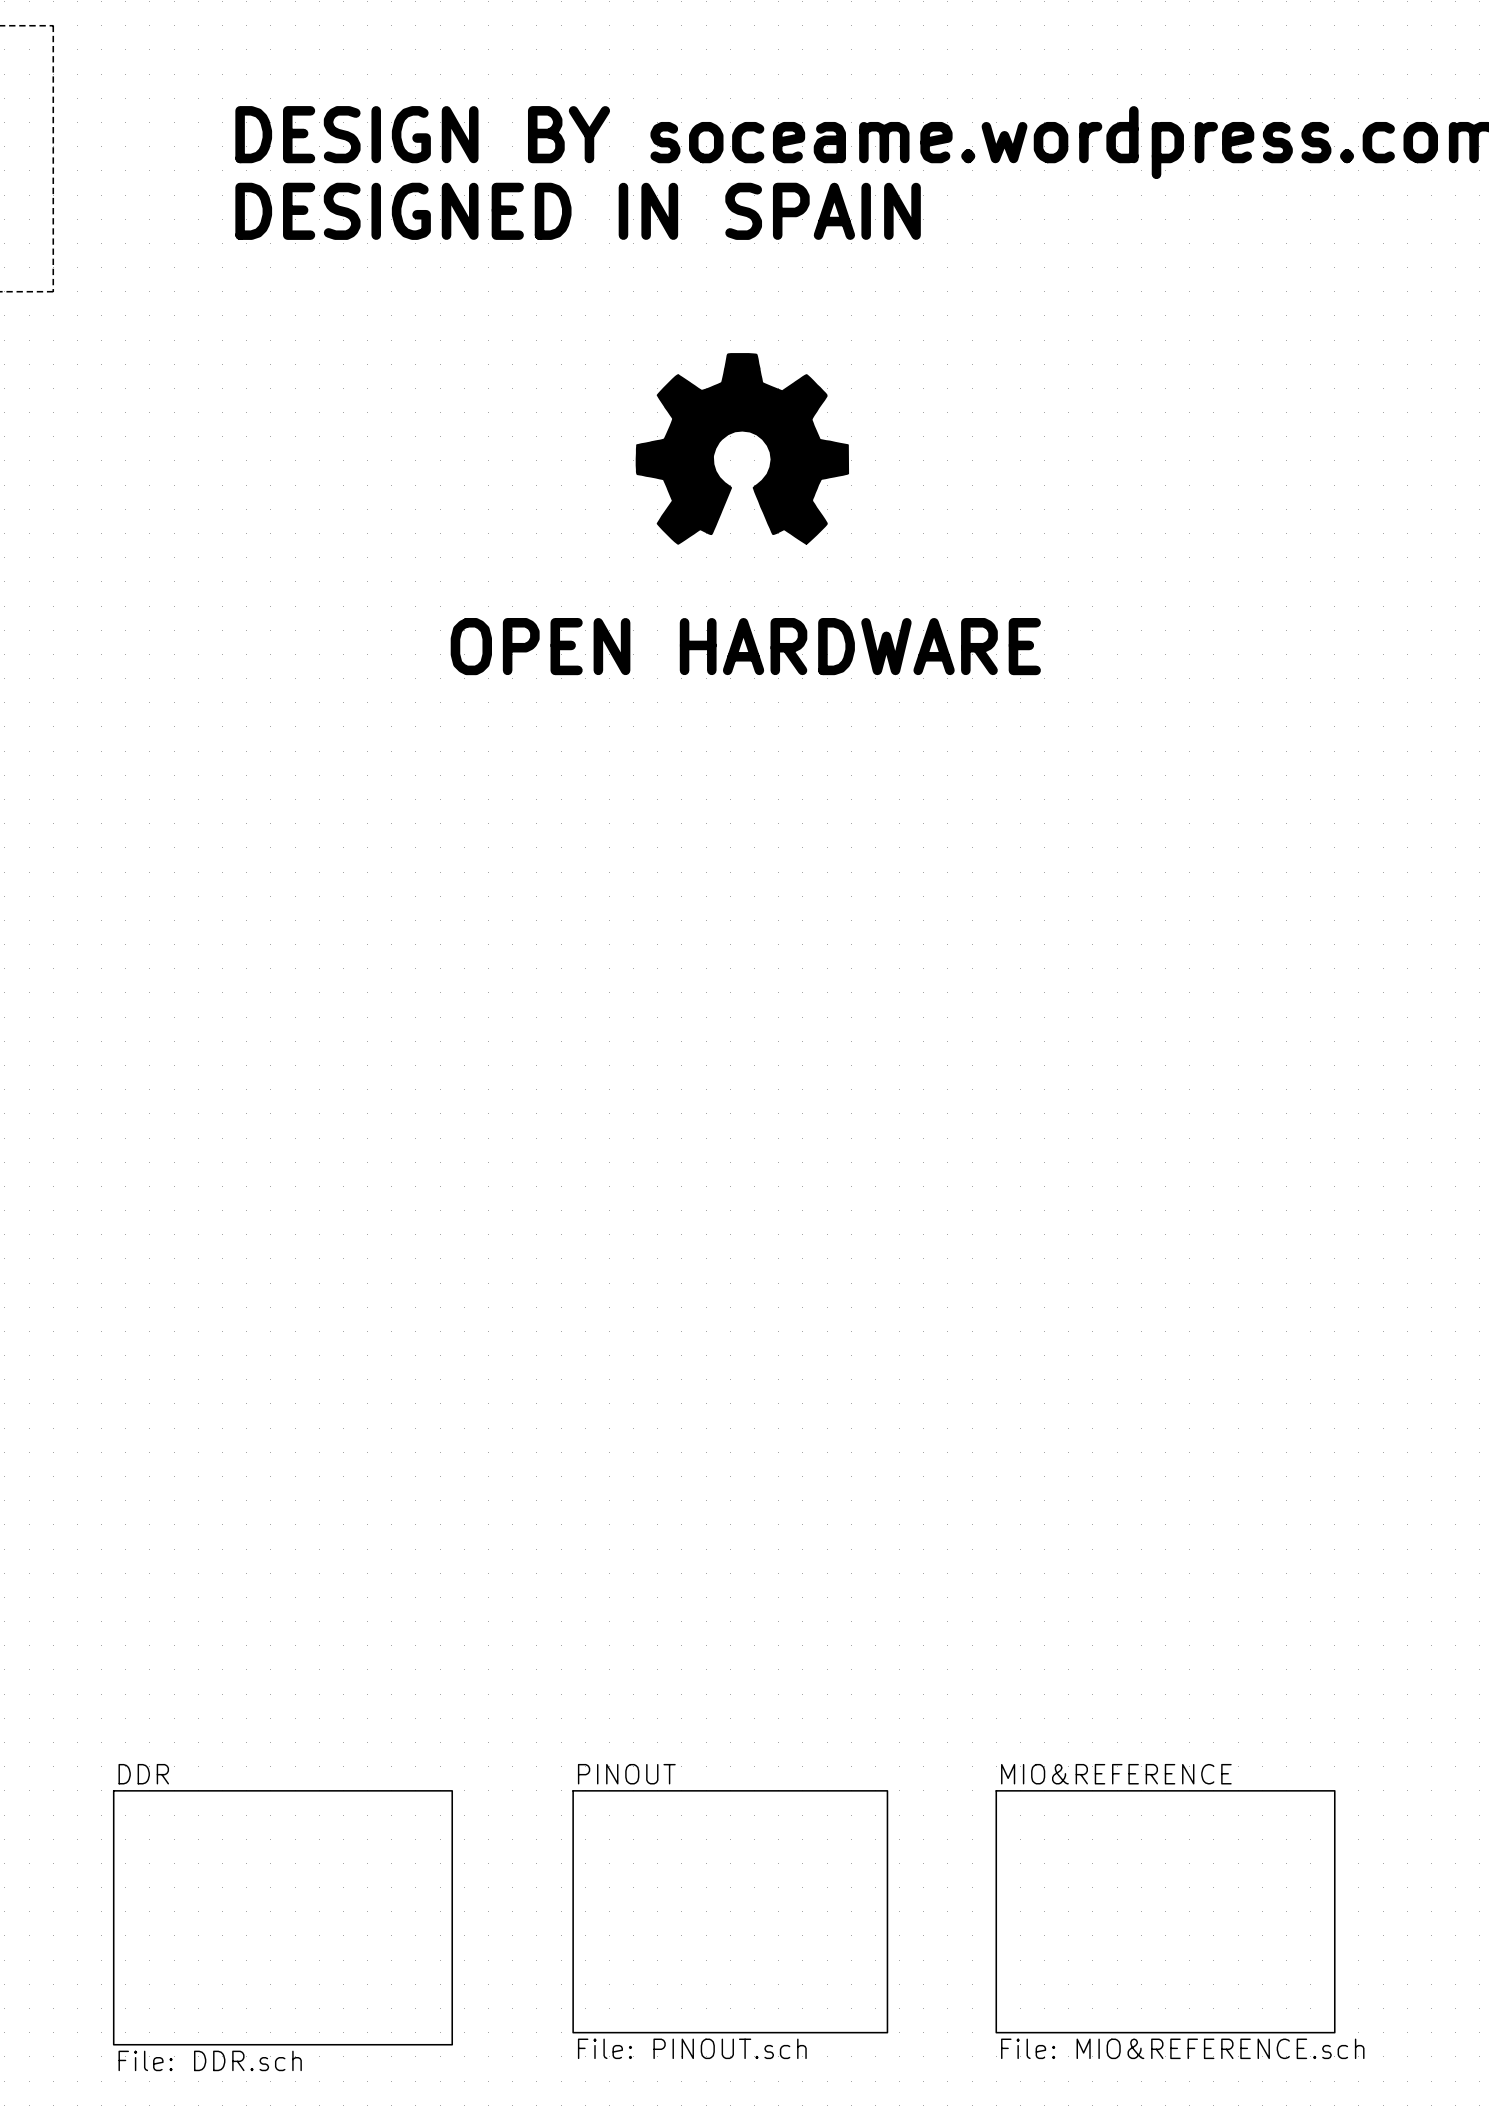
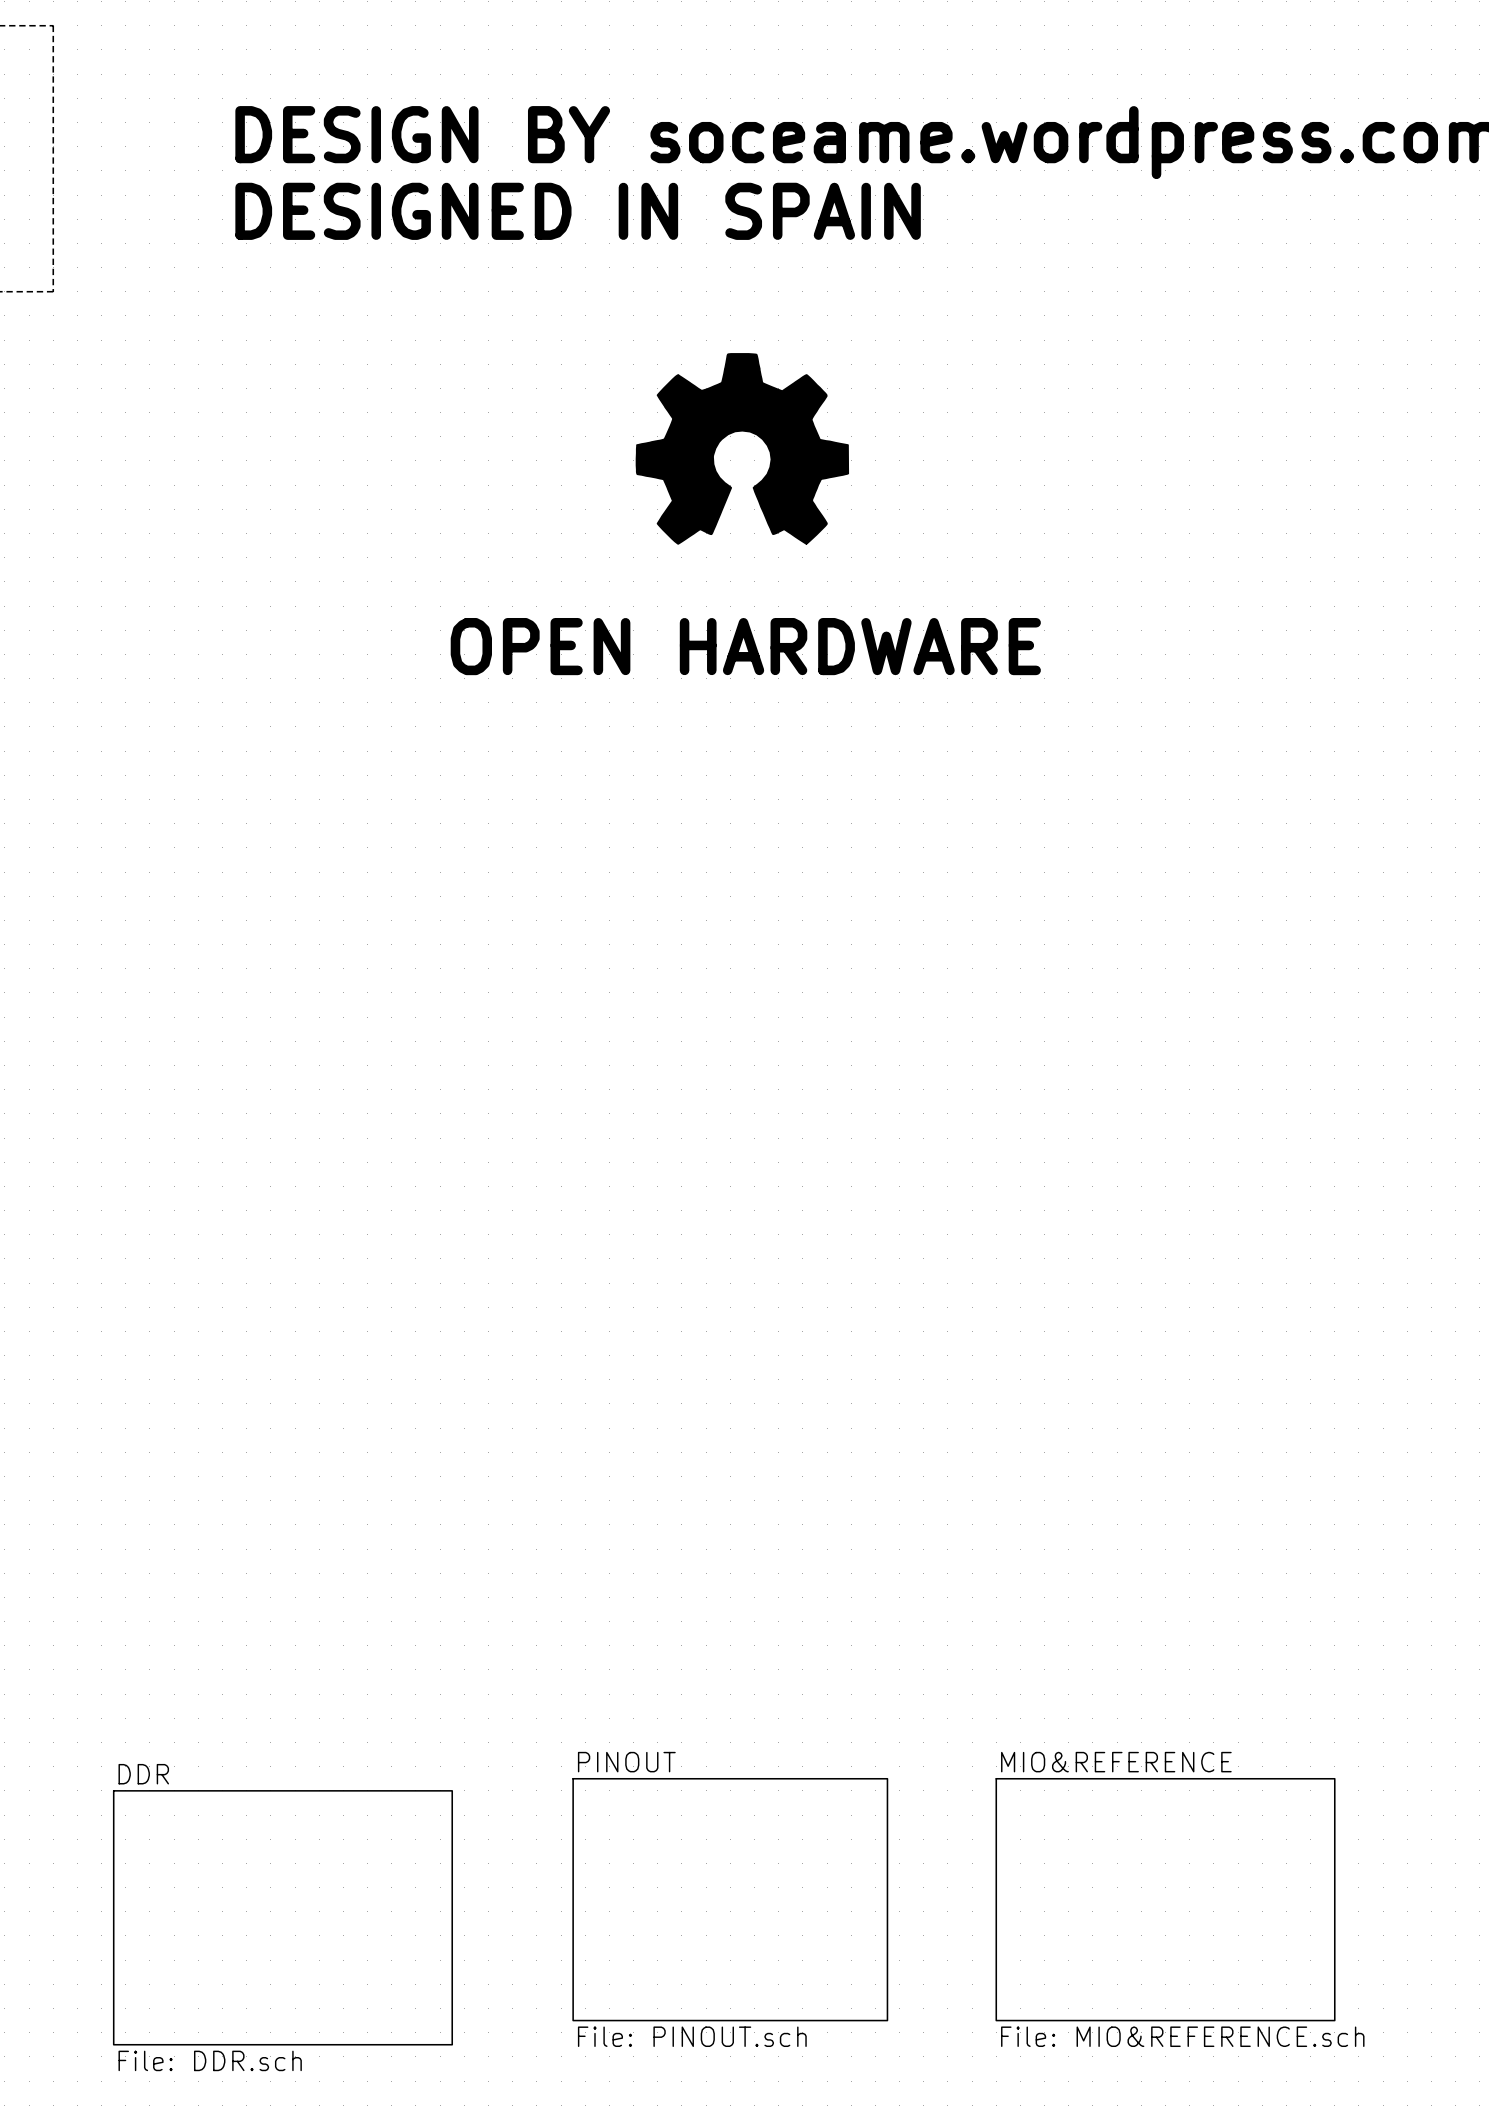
sheet PINOUT position: (730, 1911) -> (730, 1899)
sheet MIO&REFERENCE position: (1165, 1911) -> (1165, 1899)

